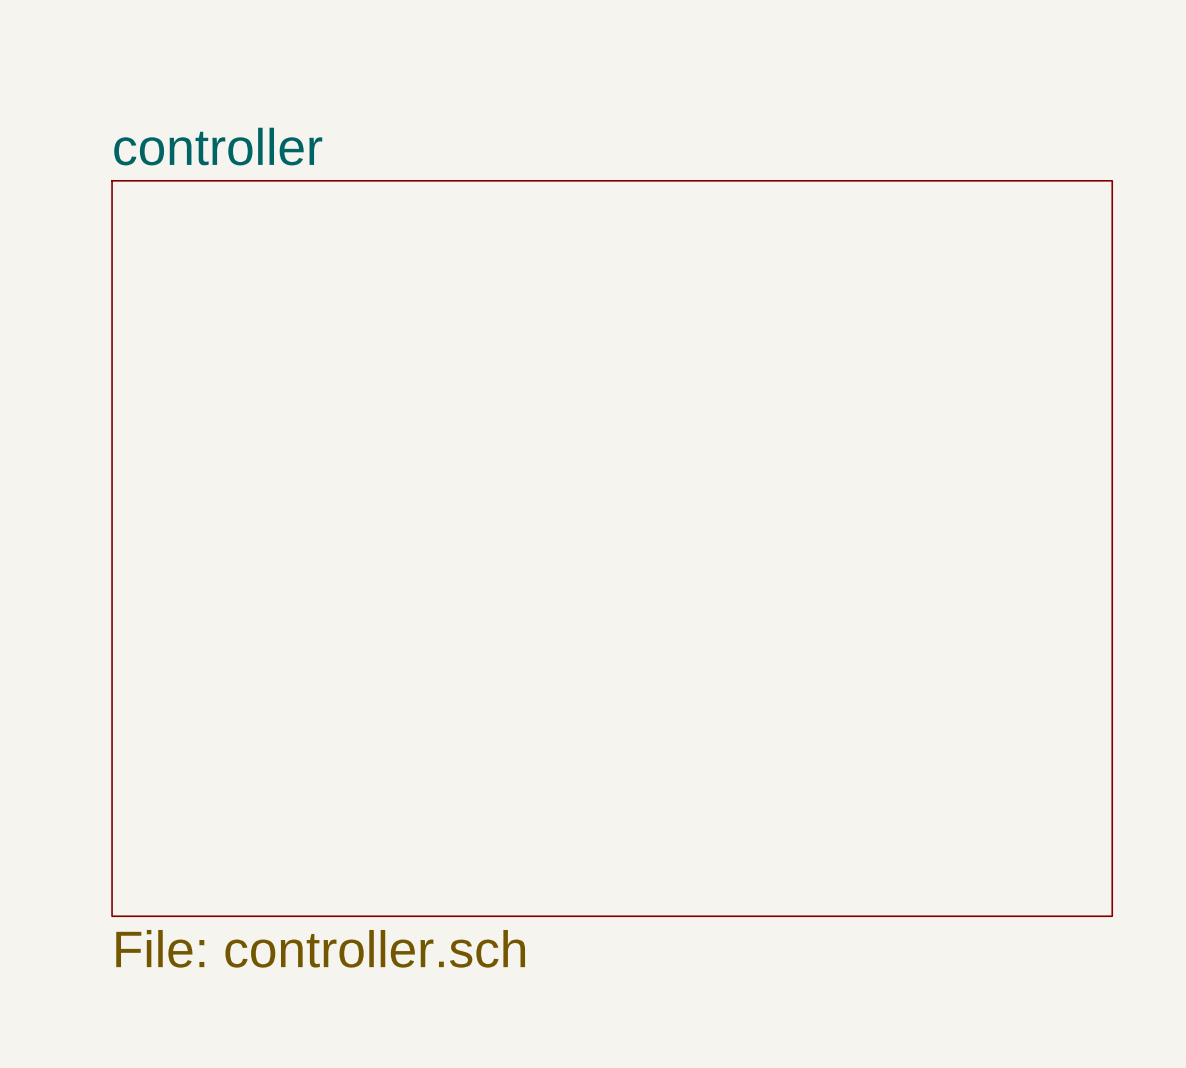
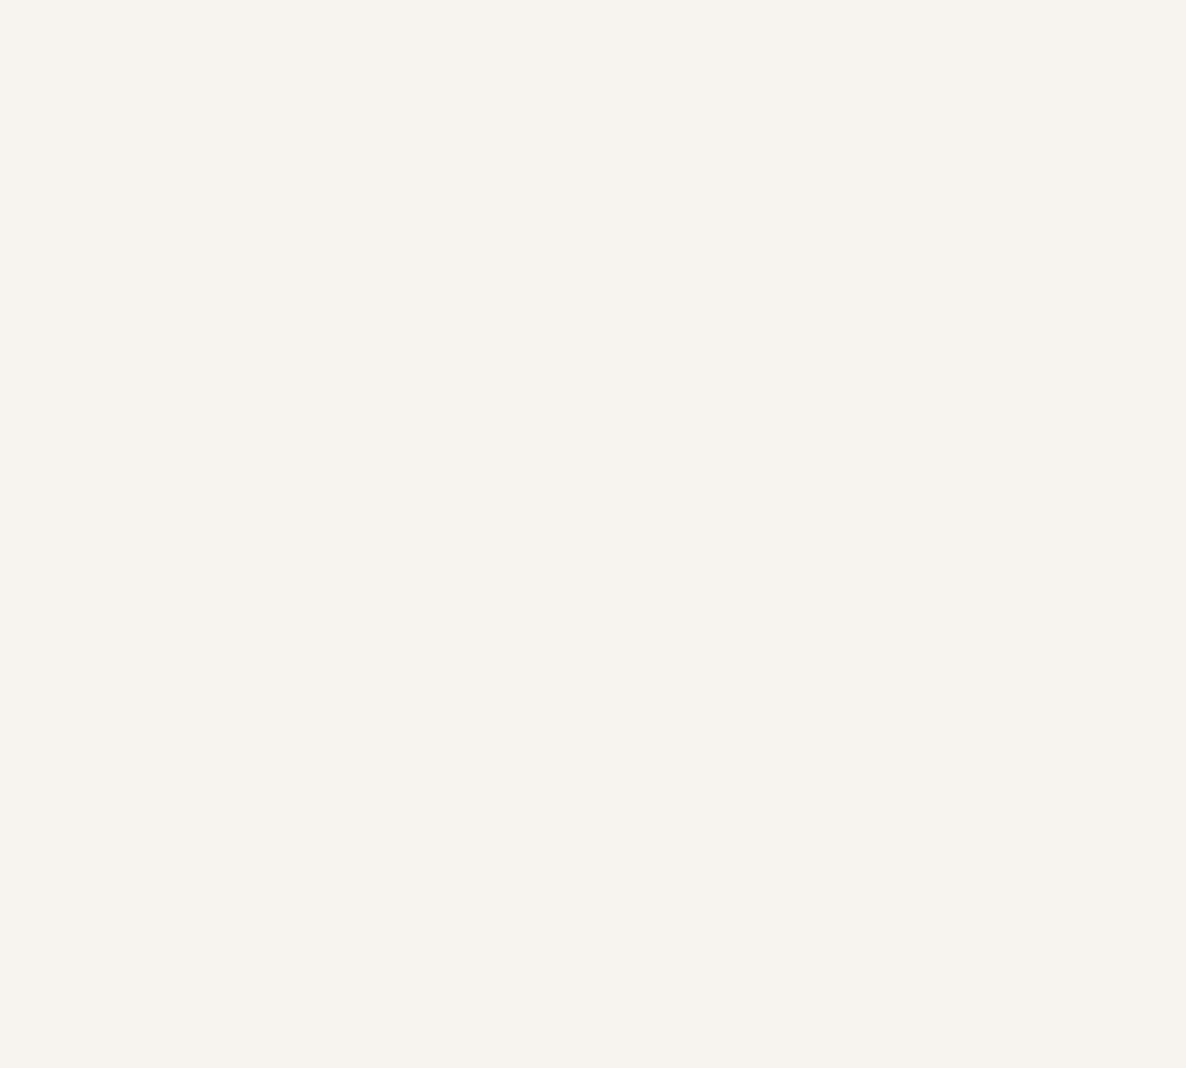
sheet controller: File: controller.sch (612, 548) -> none

